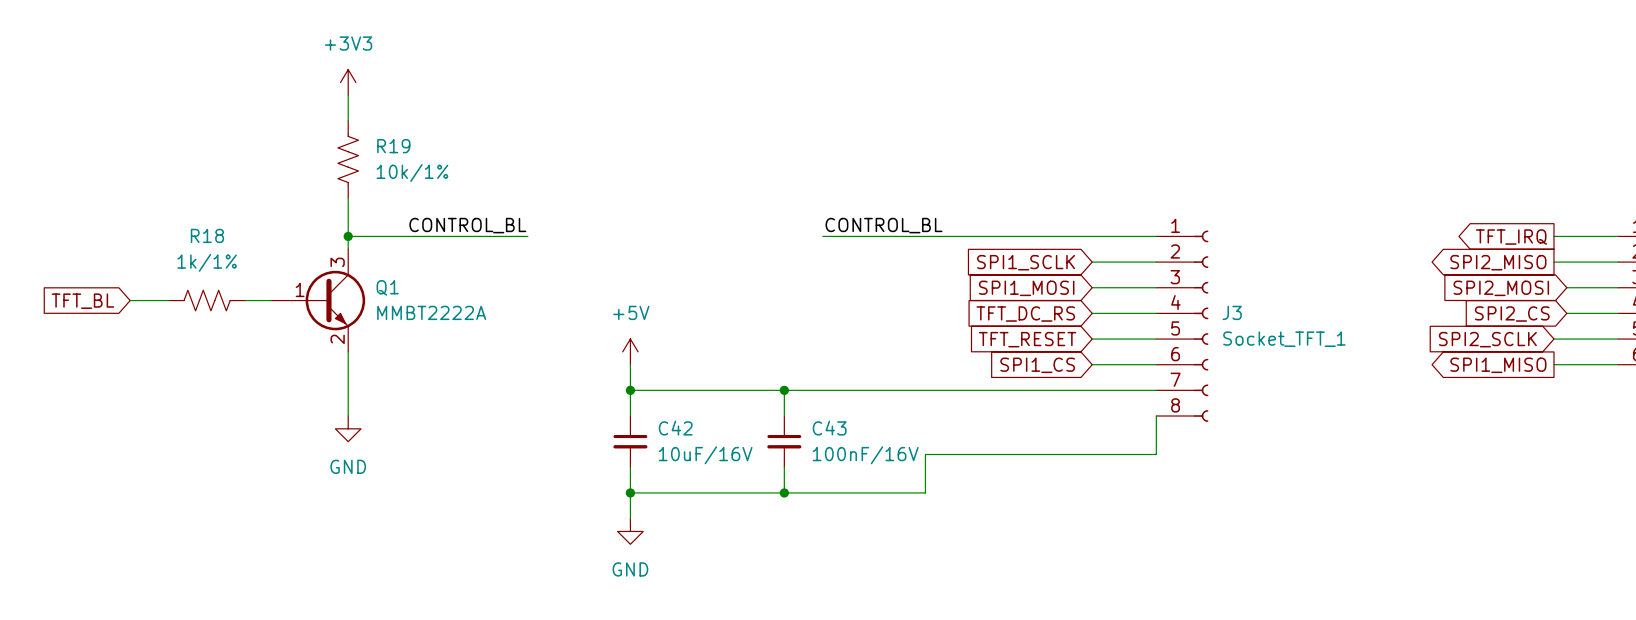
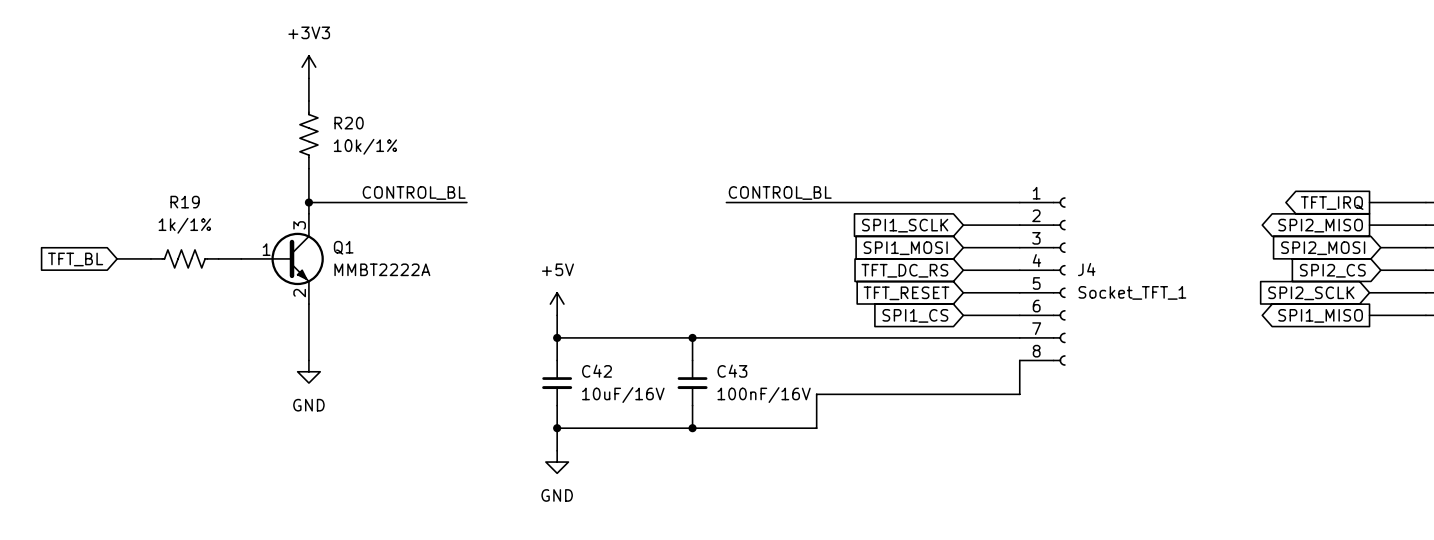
R19 name: R19 (393, 146) -> R20 (349, 123)
R18 name: R18 (207, 235) -> R19 (185, 202)
J3 name: J3 (1232, 312) -> J4 (1086, 269)

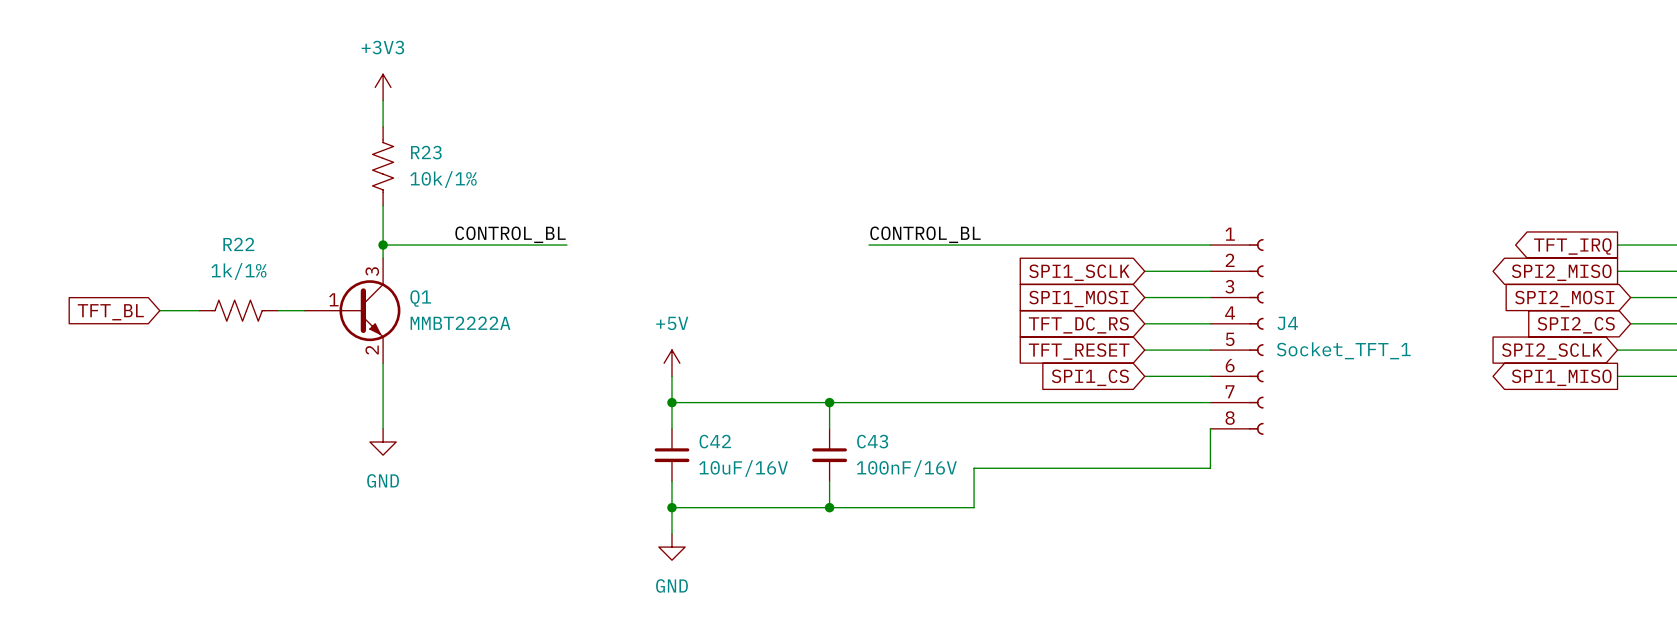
R20 name: R20 (349, 123) -> R23 (426, 152)
R19 name: R19 (185, 202) -> R22 (238, 244)

